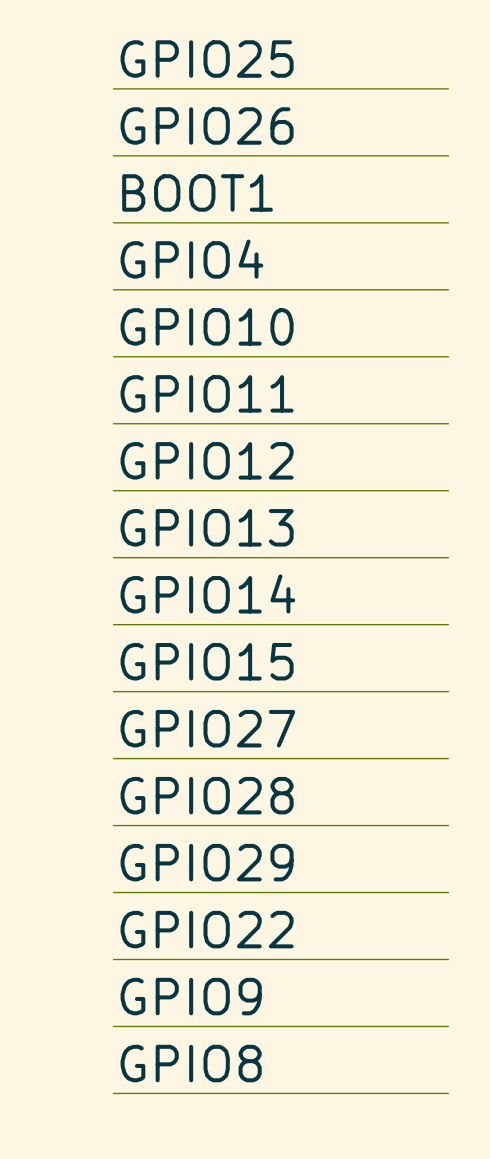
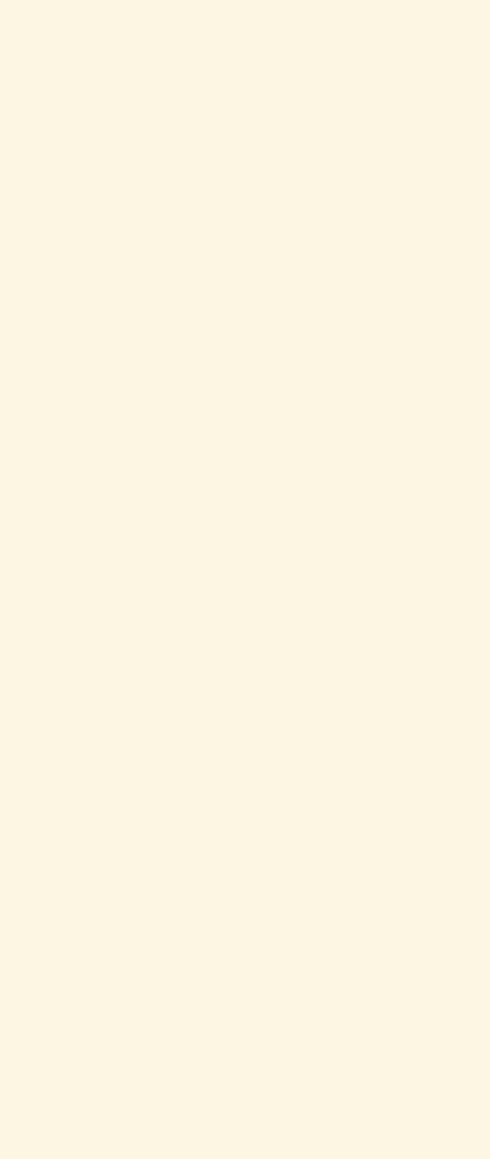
label: GPIO25 (207, 59) -> none
wire: (113, 88) (448, 88) -> none
label: GPIO26 (207, 125) -> none
wire: (113, 155) (448, 155) -> none
label: BOOT1 (197, 192) -> none
wire: (113, 222) (448, 222) -> none
label: GPIO4 (191, 259) -> none
wire: (113, 289) (448, 289) -> none
label: GPIO10 (207, 326) -> none
wire: (113, 356) (448, 356) -> none
label: GPIO11 (207, 393) -> none
wire: (113, 423) (448, 423) -> none
label: GPIO12 (207, 460) -> none
wire: (113, 490) (448, 490) -> none
label: GPIO13 (207, 527) -> none
wire: (113, 557) (448, 557) -> none
label: GPIO14 (207, 593) -> none
wire: (113, 624) (448, 624) -> none
label: GPIO15 (207, 661) -> none
wire: (113, 691) (448, 691) -> none
label: GPIO27 (207, 728) -> none
wire: (113, 758) (448, 758) -> none
label: GPIO28 (207, 795) -> none
wire: (113, 825) (448, 825) -> none
label: GPIO29 (207, 862) -> none
wire: (113, 892) (448, 892) -> none
label: GPIO22 (207, 929) -> none
wire: (113, 959) (448, 959) -> none
label: GPIO9 (191, 996) -> none
wire: (113, 1026) (448, 1026) -> none
label: GPIO8 (191, 1063) -> none
wire: (113, 1093) (448, 1093) -> none

